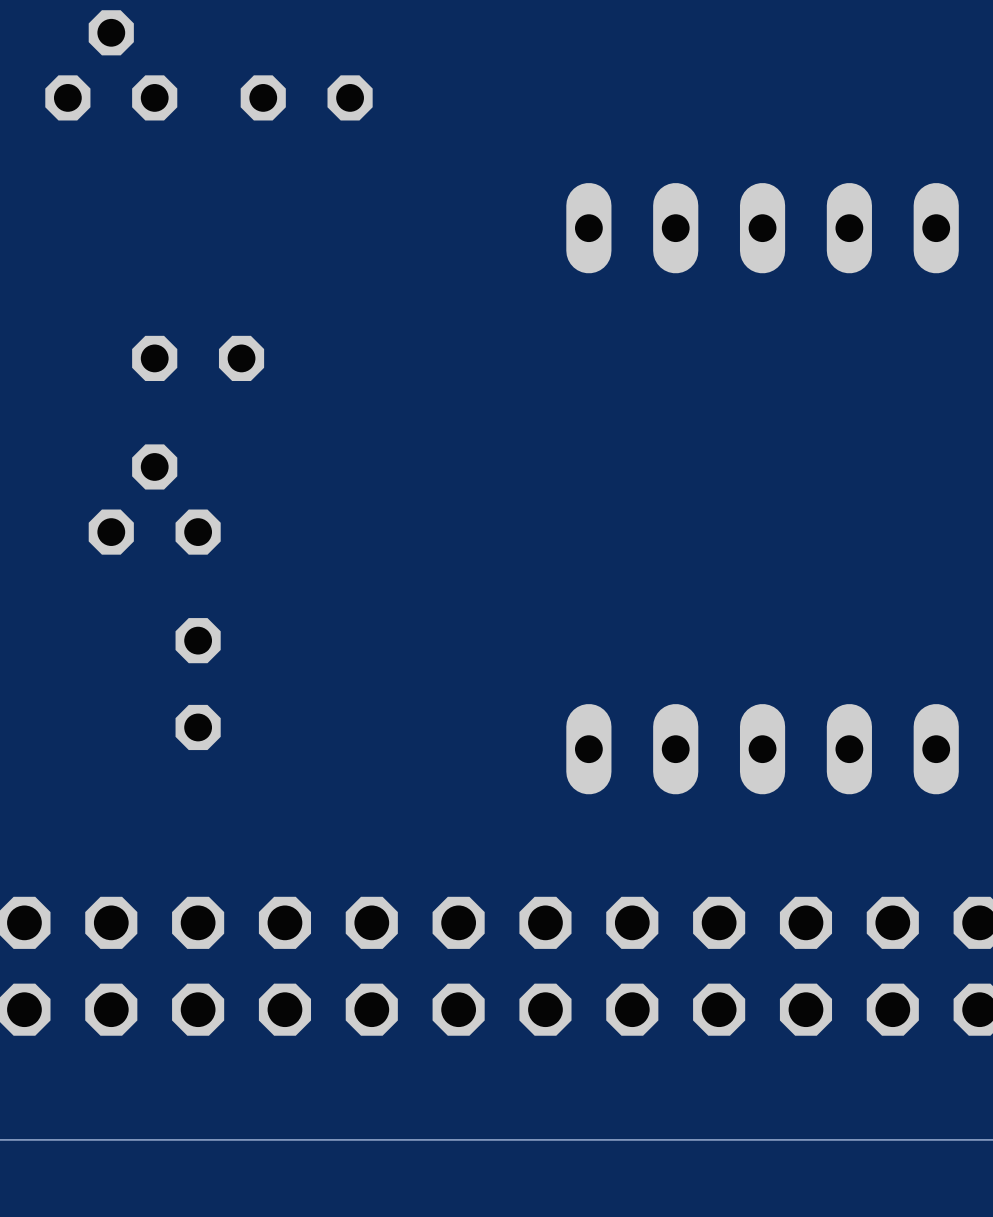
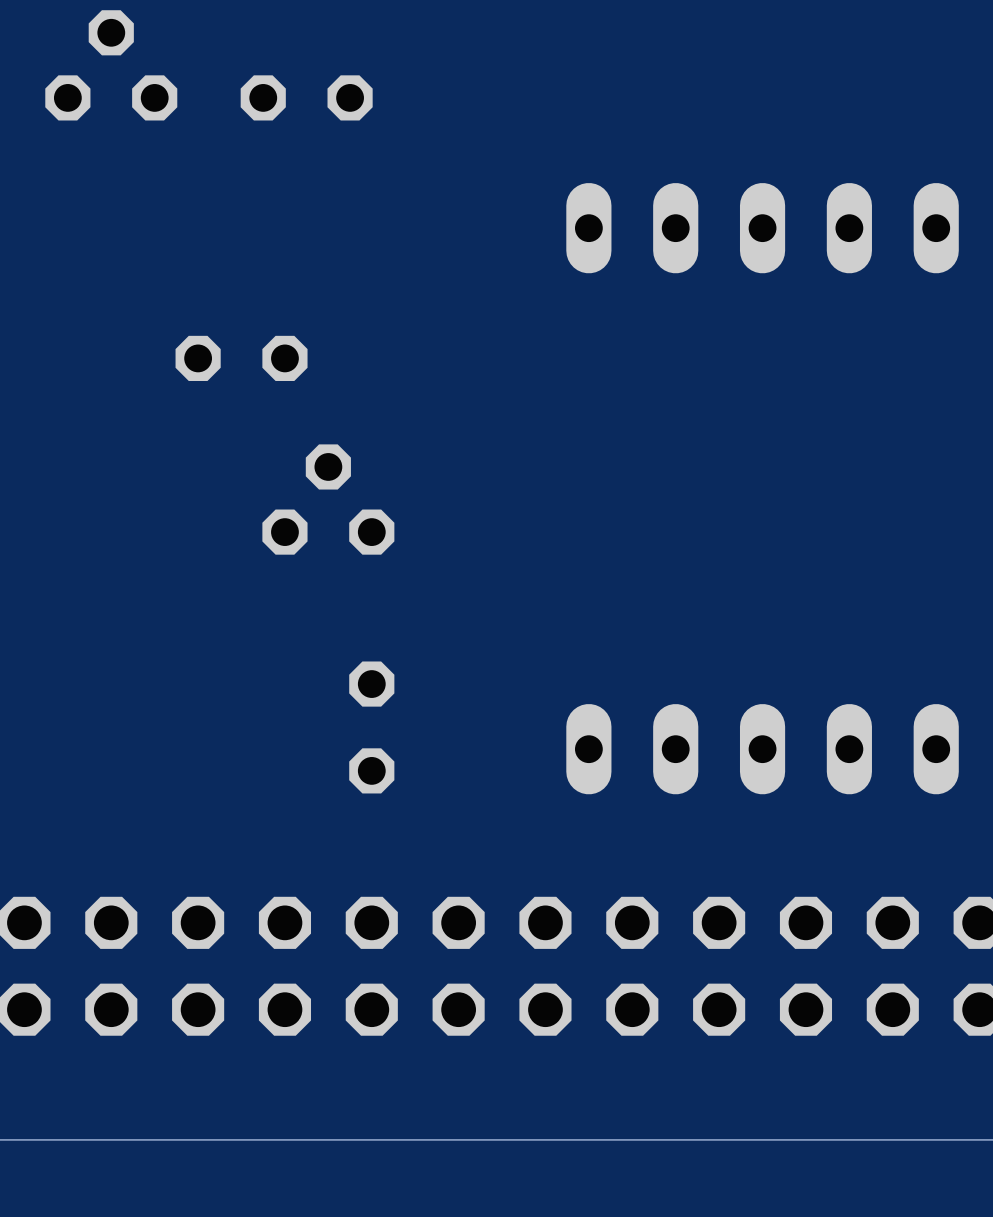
part position: (198, 358) -> (241, 358)
part position: (154, 499) -> (328, 499)
part: (198, 684) -> none
part: none -> (371, 727)

